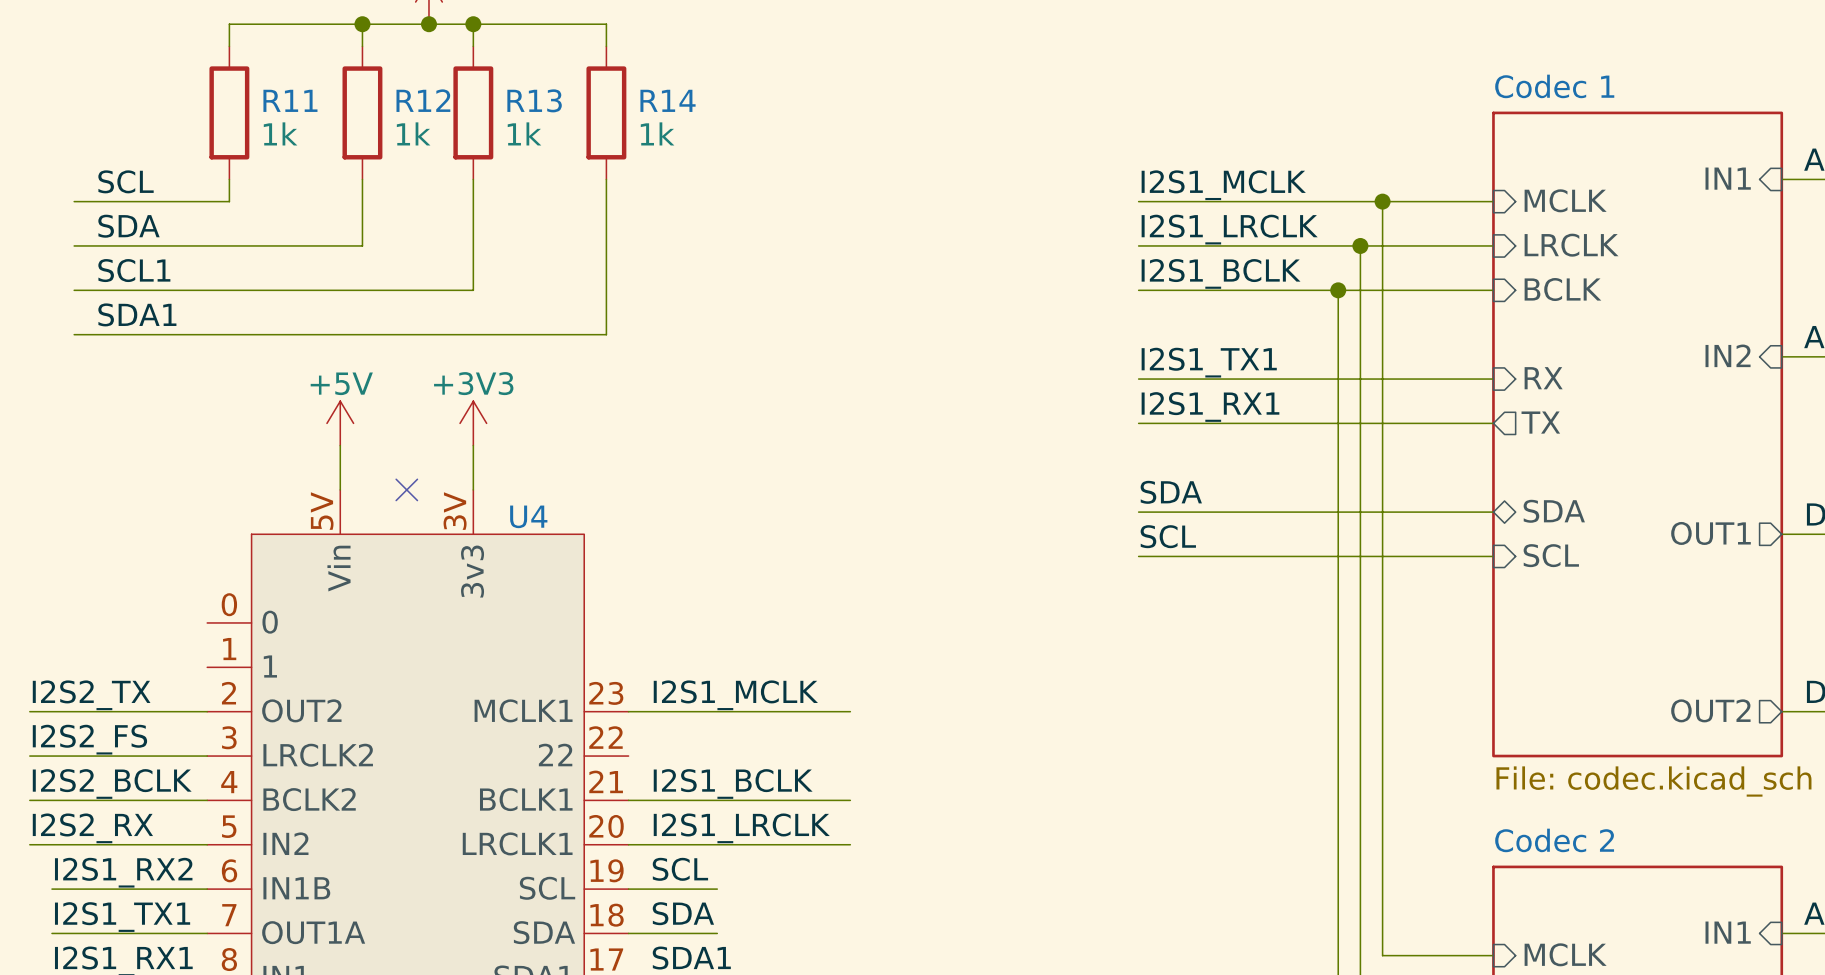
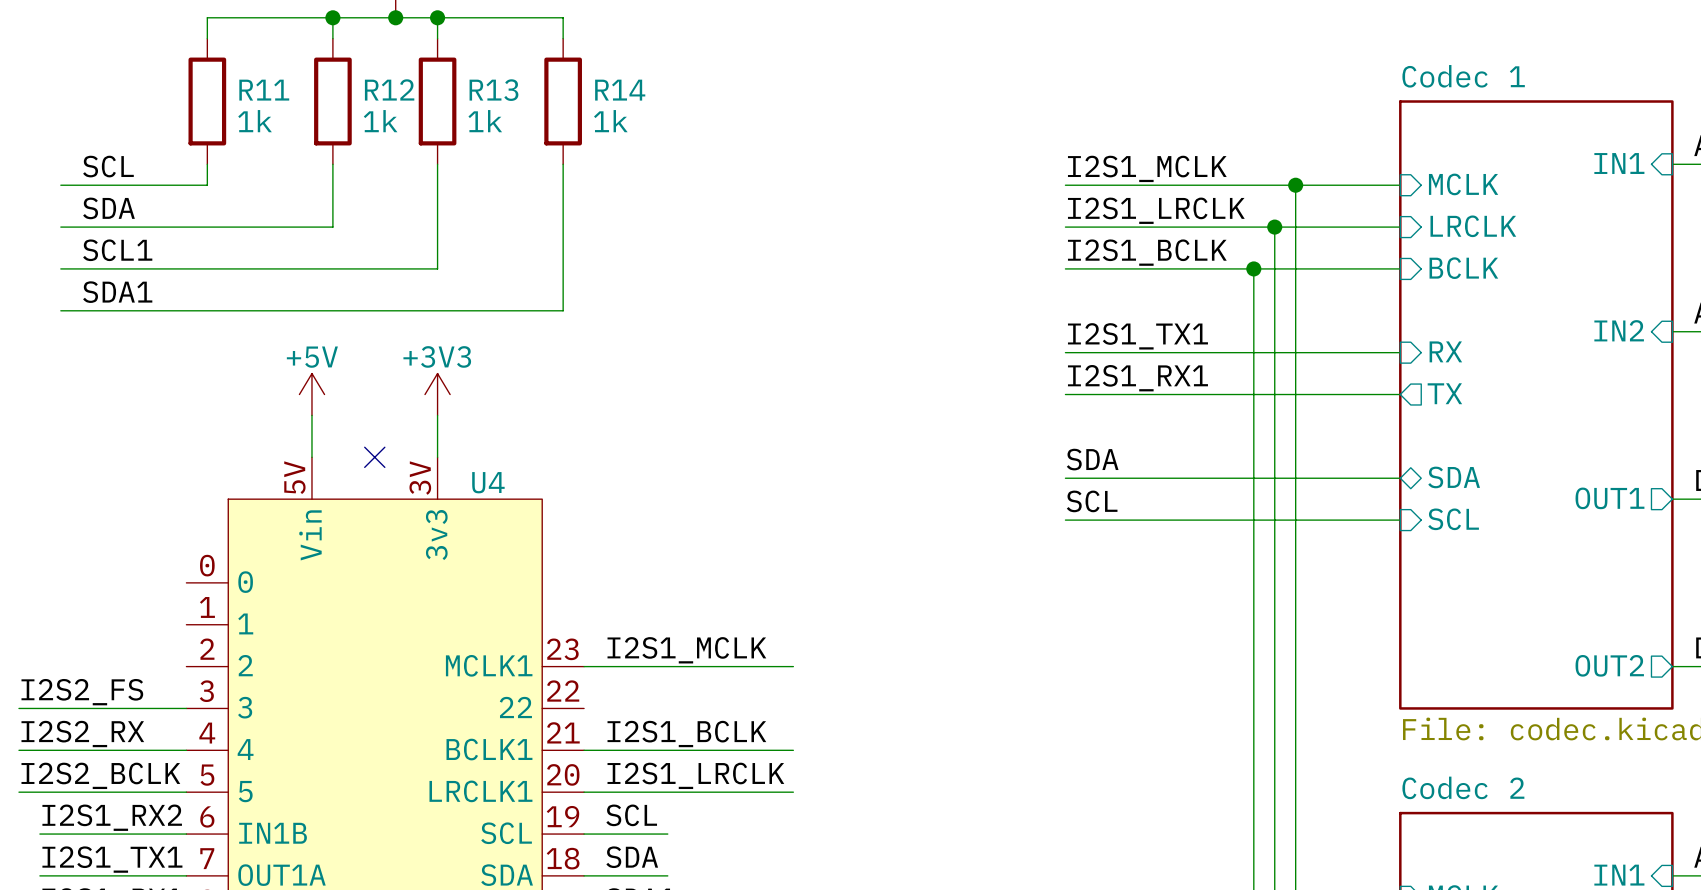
label: I2S2_TX (91, 695) -> none
U4 pin name: OUT2 (301, 710) -> 2 (245, 665)
wire: (29, 711) (207, 711) -> none
U4 pin name: LRCLK2 (318, 755) -> 3 (245, 707)
label: I2S2_BCLK (112, 783) -> I2S2_RX (82, 733)
U4 pin name: BCLK2 (309, 799) -> 4 (245, 749)
label: I2S2_RX (92, 828) -> I2S2_BCLK (100, 775)
U4 pin name: IN2 (285, 843) -> 5 (245, 791)

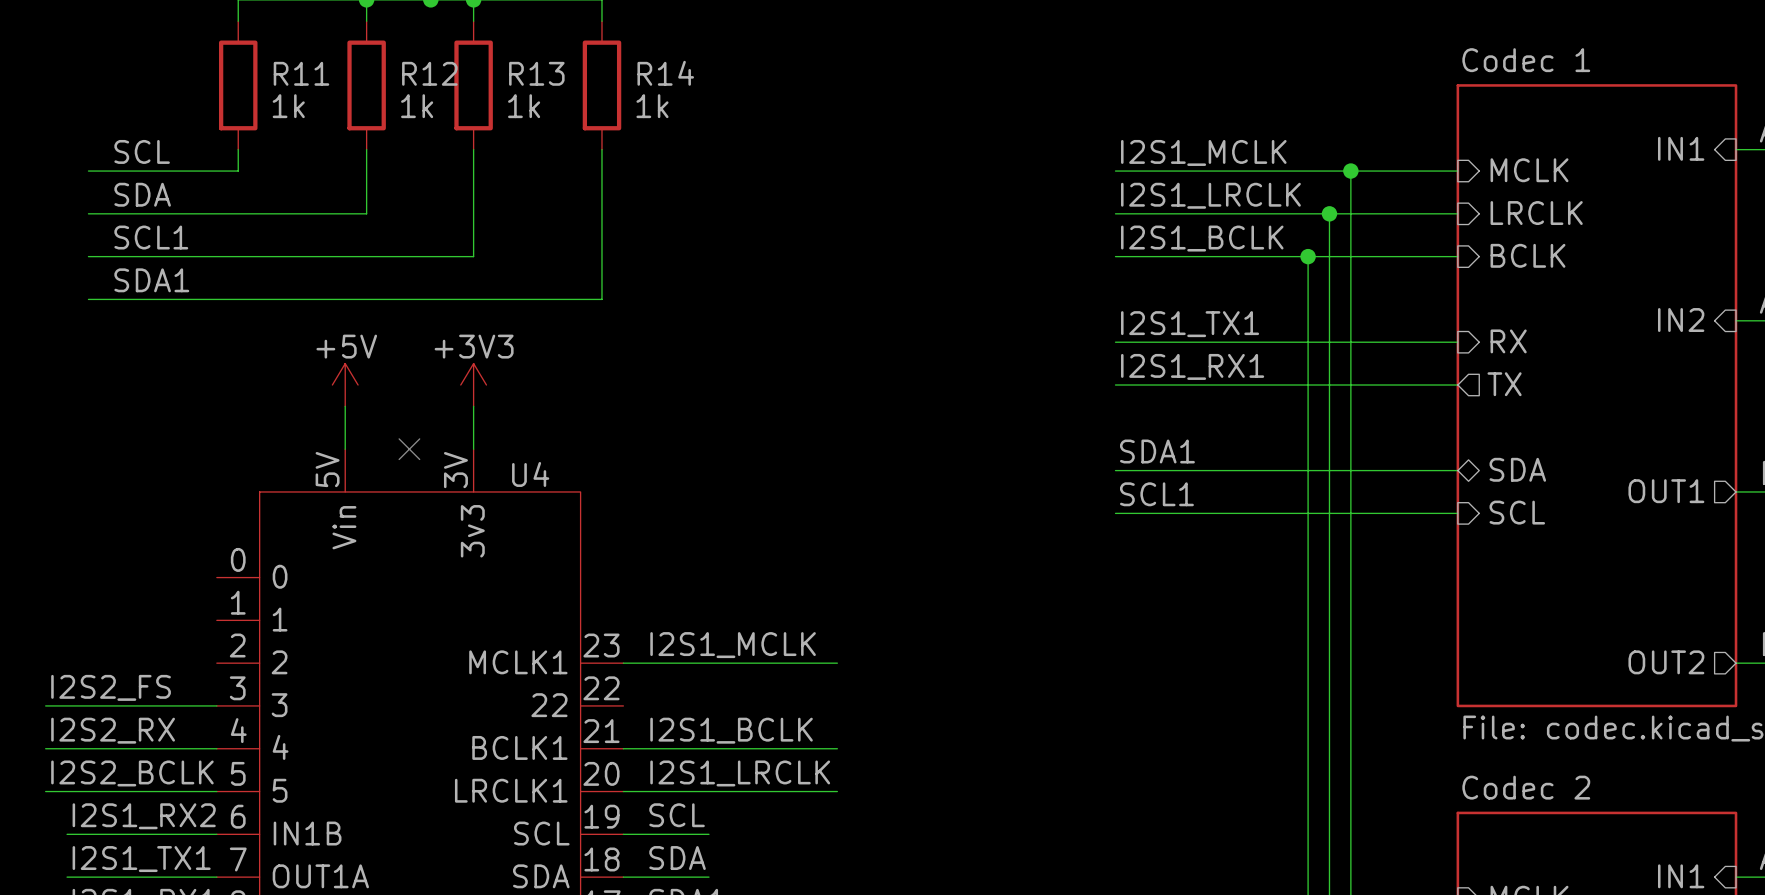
label: SDA (1092, 459) -> SDA1 (1157, 451)
label: SCL (1092, 501) -> SCL1 (1156, 494)

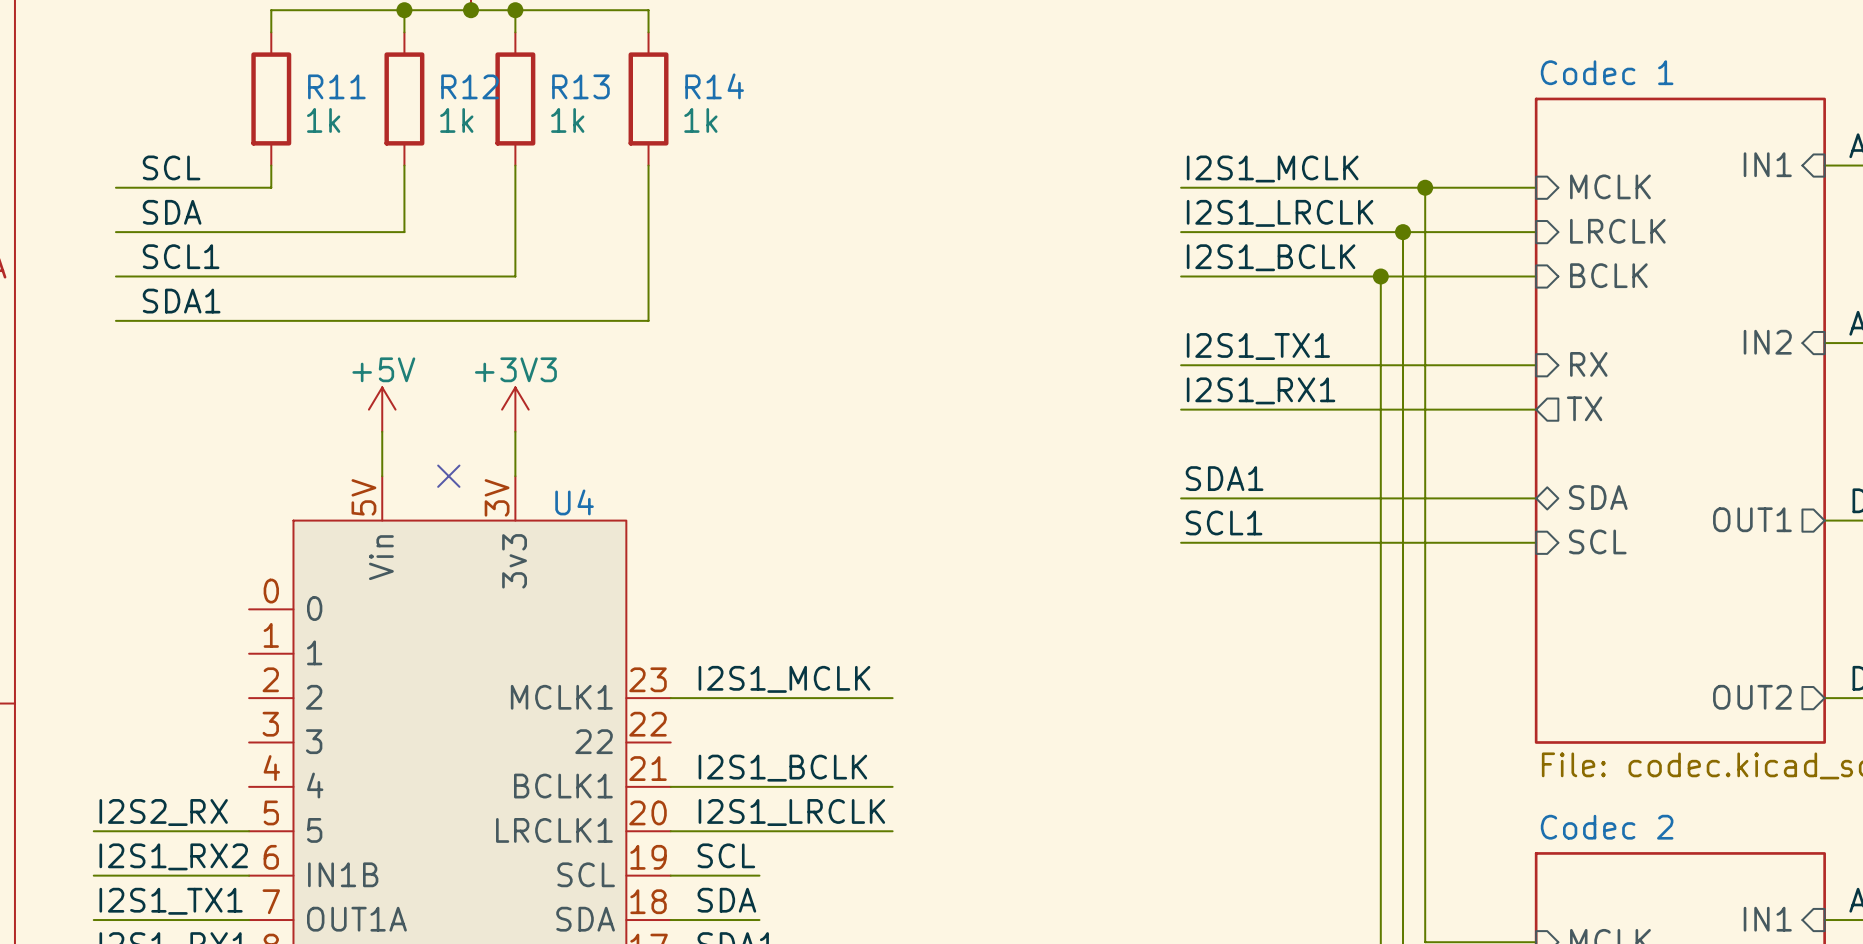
label: I2S2_FS (111, 687) -> none
wire: (45, 705) (216, 705) -> none
label position: I2S2_RX (113, 730) -> I2S2_RX (163, 812)
wire: (45, 748) (216, 748) -> none
label: I2S2_BCLK (132, 773) -> none
wire: (45, 791) (67, 791) -> none

